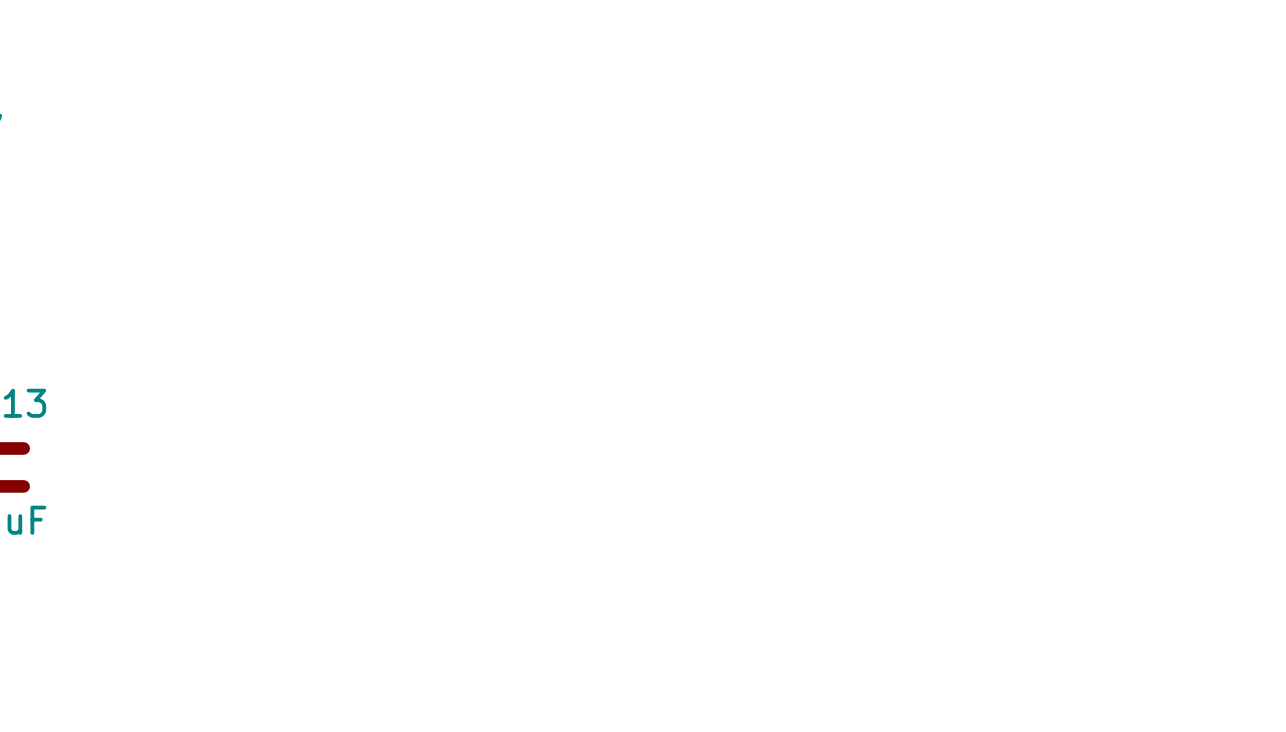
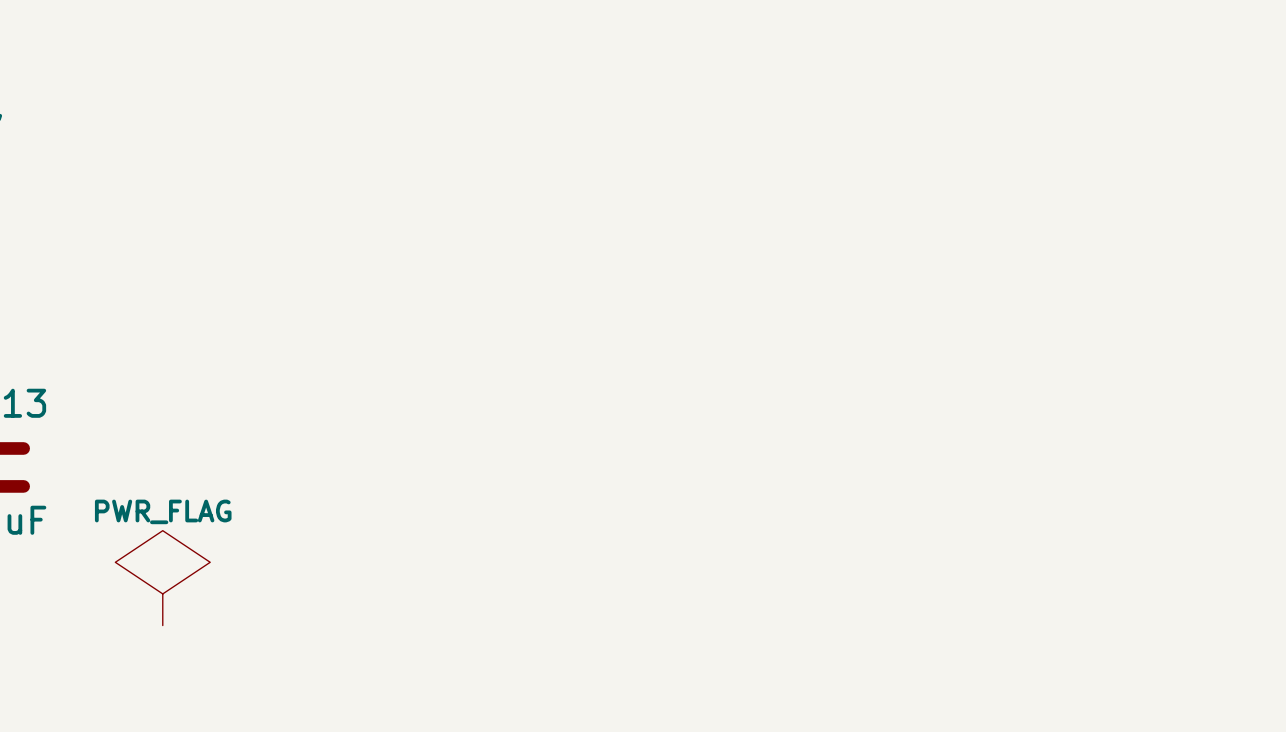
power symbol: none -> PWR_FLAG (162, 578)

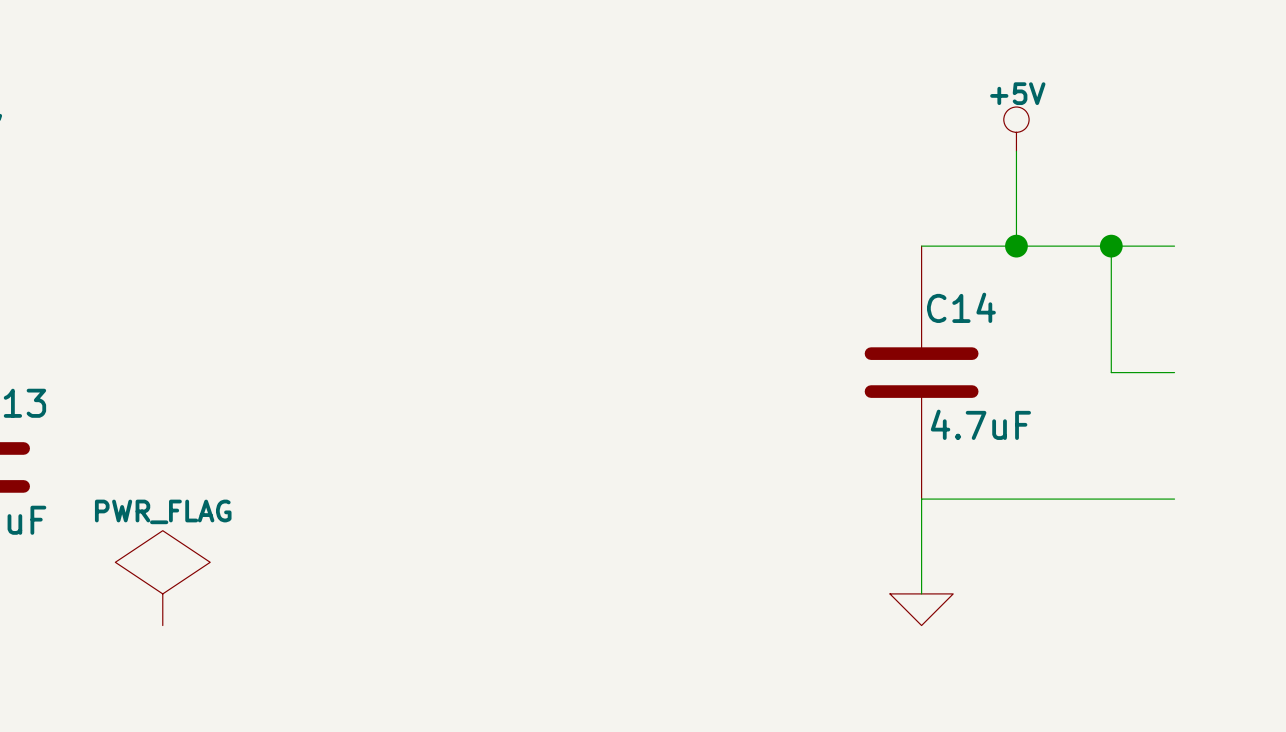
power symbol: none -> +5V (1016, 129)
wire: none -> (1016, 151) (1016, 246)
wire: none -> (921, 246) (1174, 246)
junction: none -> (1016, 246)
wire: none -> (1111, 246) (1111, 372) (1174, 372)
junction: none -> (1111, 246)
C14: none -> 4.7uF (921, 372)
wire: none -> (1174, 499) (921, 499) (921, 593)
power symbol: none -> (921, 609)

